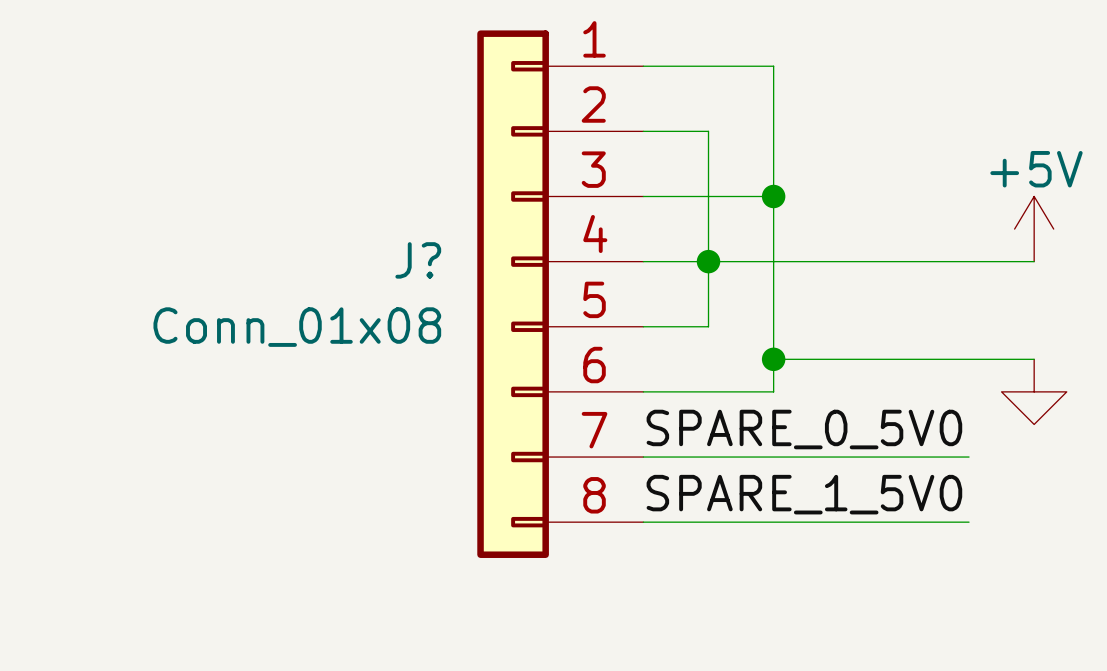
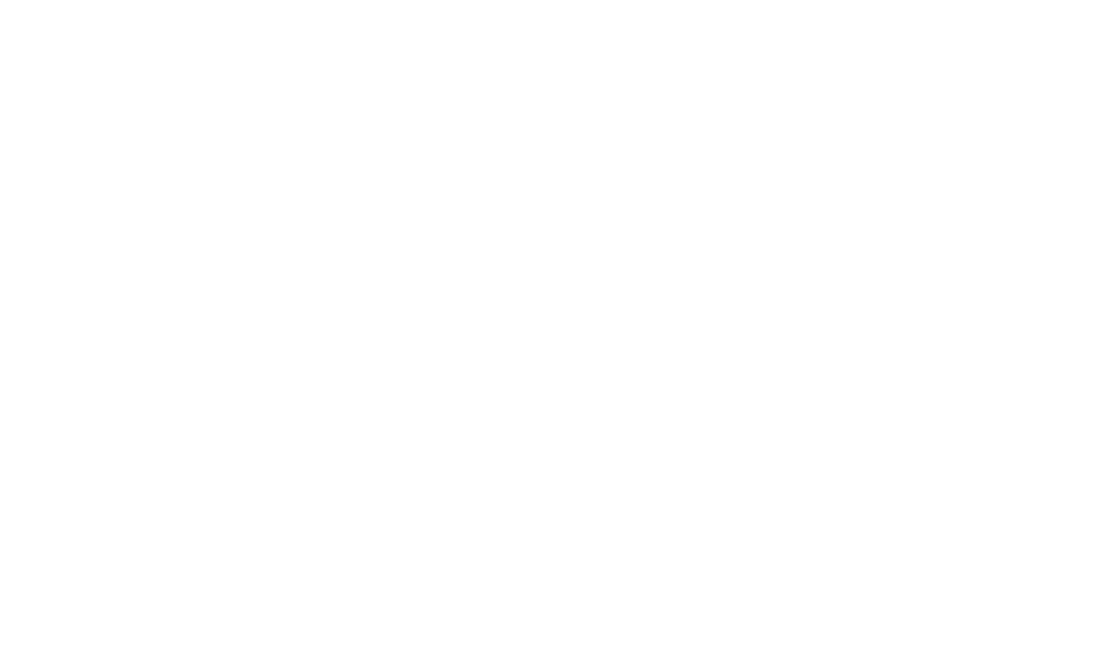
wire: (643, 66) (773, 66) (773, 391) (643, 391) -> none
wire: (643, 131) (708, 131) (708, 326) (643, 326) -> none
wire: (643, 196) (773, 196) -> none
junction: (773, 196) -> none
power symbol: +5V (1034, 229) -> none
wire: (643, 261) (1034, 261) -> none
junction: (708, 261) -> none
J?: Conn_01x08 (560, 294) -> none
wire: (773, 359) (1034, 359) -> none
junction: (773, 359) -> none
power symbol: (1034, 391) -> none
label: SPARE_0_5V0 (804, 429) -> none
wire: (643, 457) (969, 457) -> none
label: SPARE_1_5V0 (804, 494) -> none
wire: (643, 522) (969, 522) -> none

